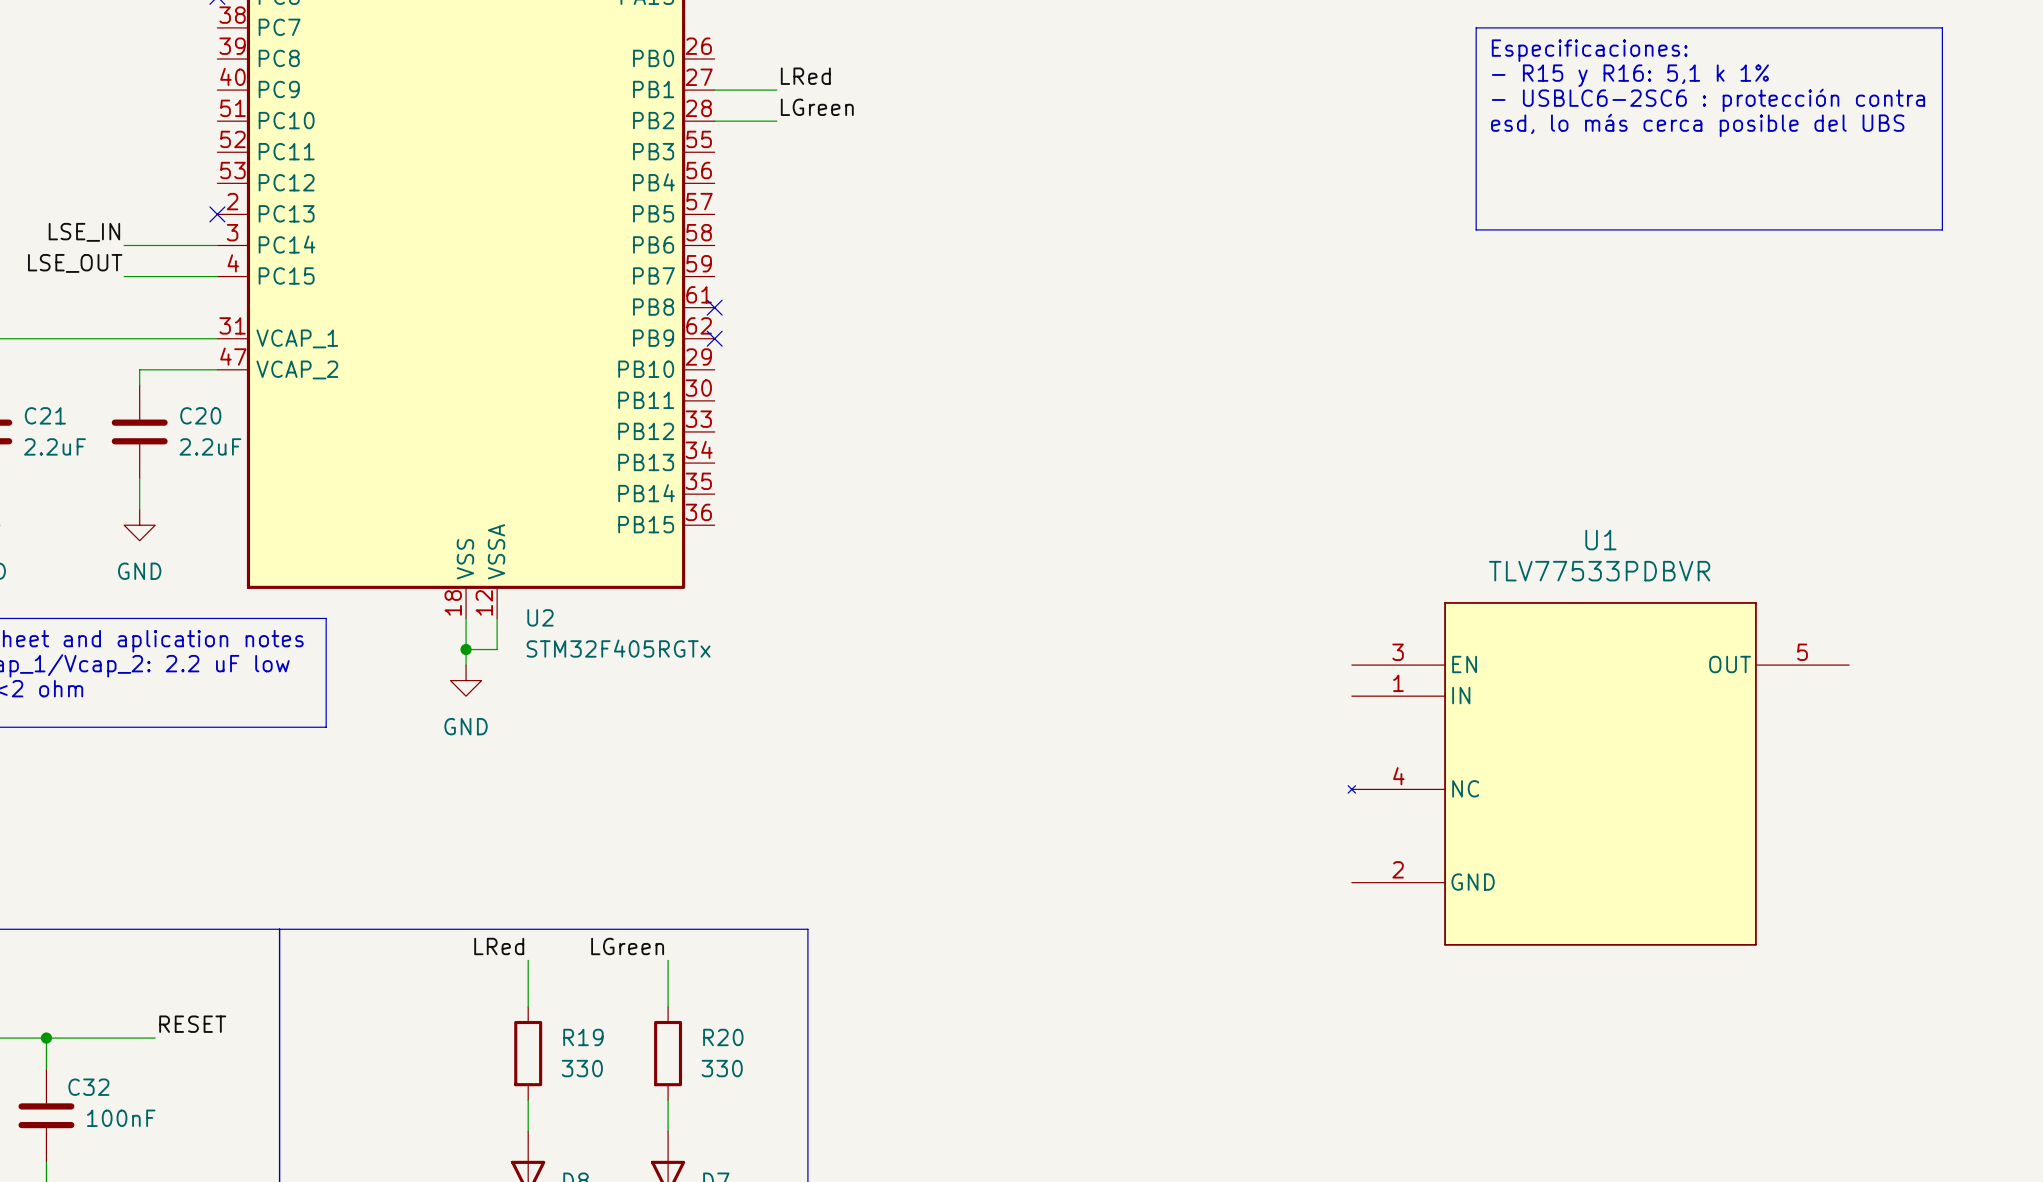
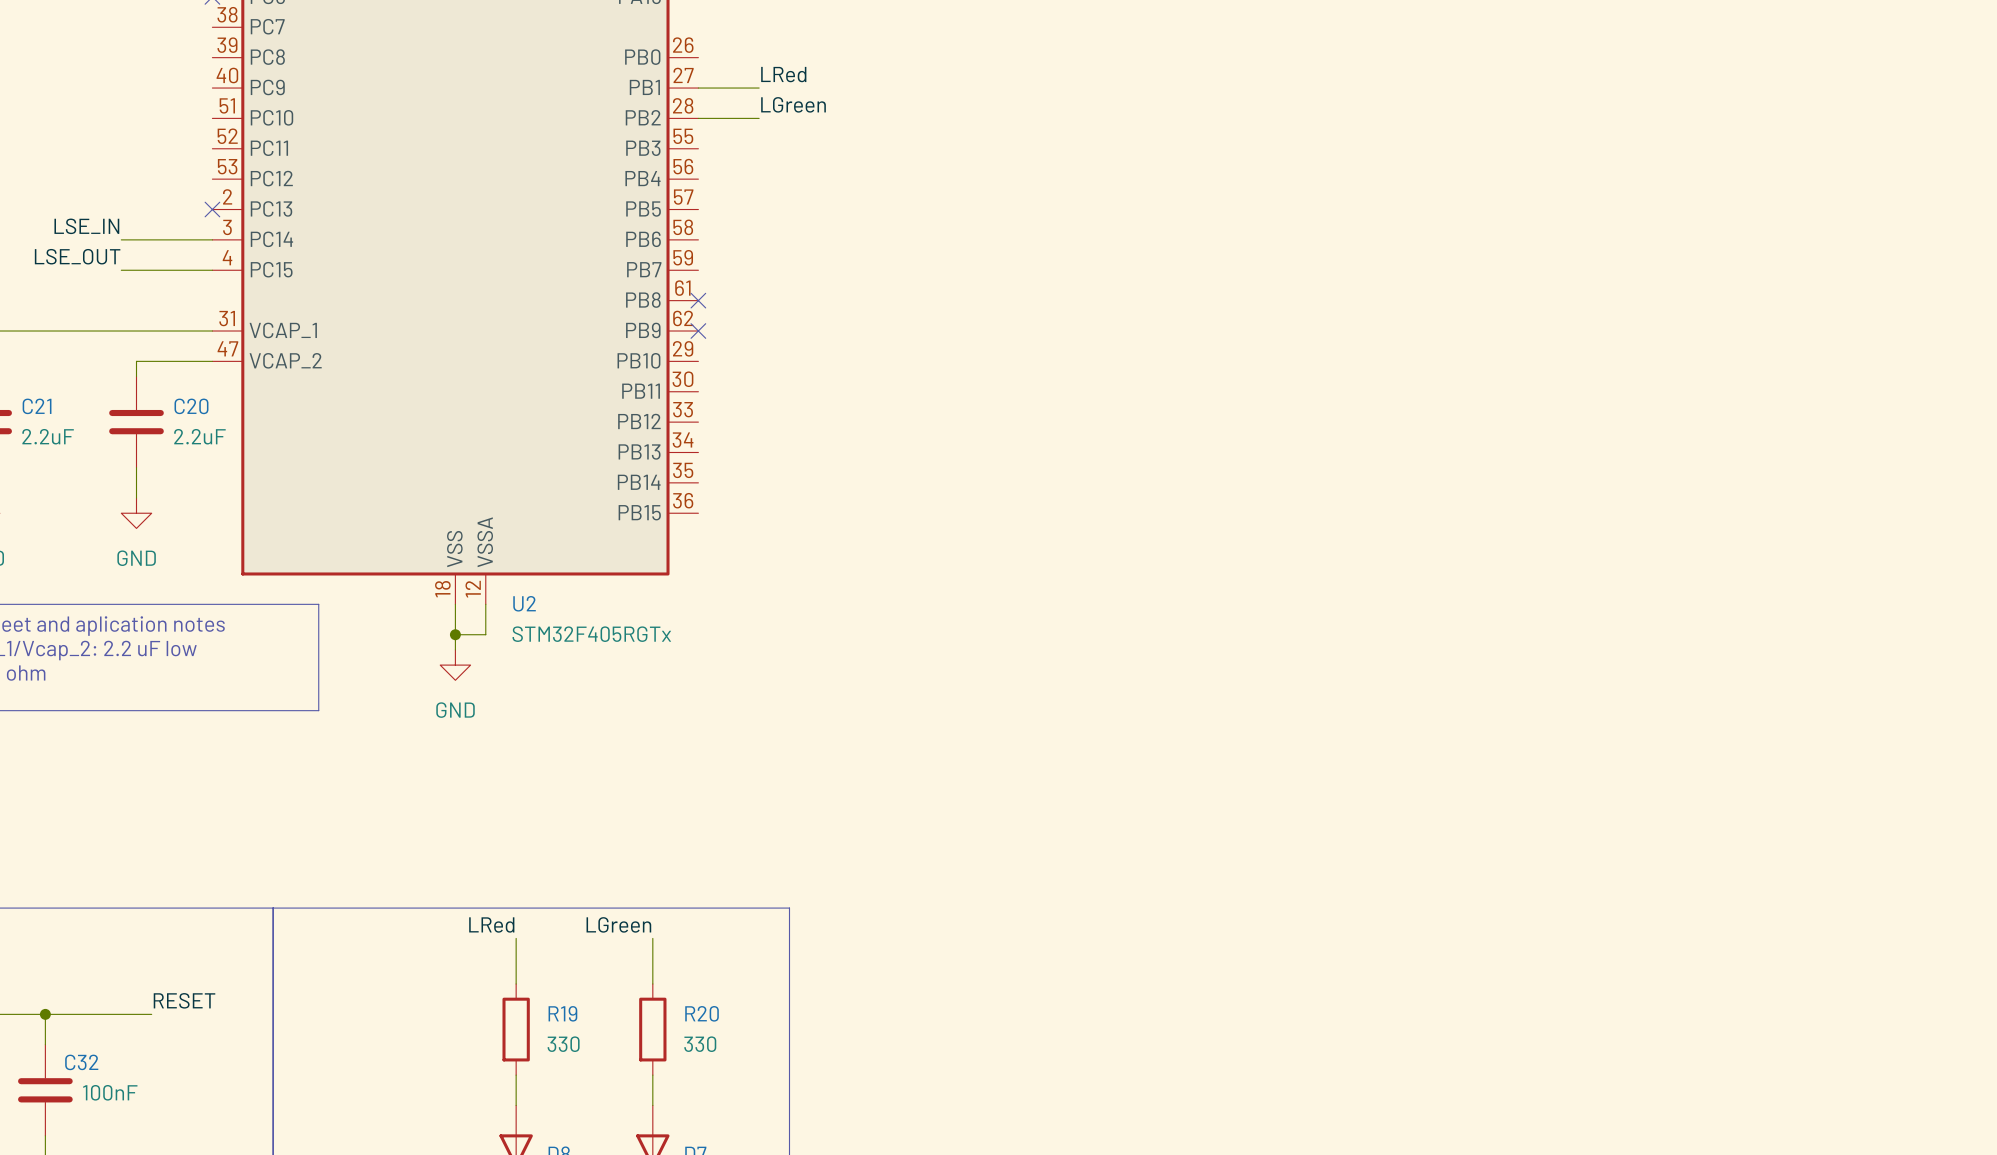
line: (1476, 27) (1942, 27) (1942, 229) (1476, 229) (1476, 27) -> none
text: Especificaciones: (1589, 50) -> none
text: - R15 y R16: 5,1 k 1% (1630, 75) -> none
text: - USBLC6-2SC6 : protección contra (1708, 100) -> none
text: esd, lo más cerca posible del UBS (1697, 125) -> none
U1: TLV77533PDBVR (1598, 773) -> none

